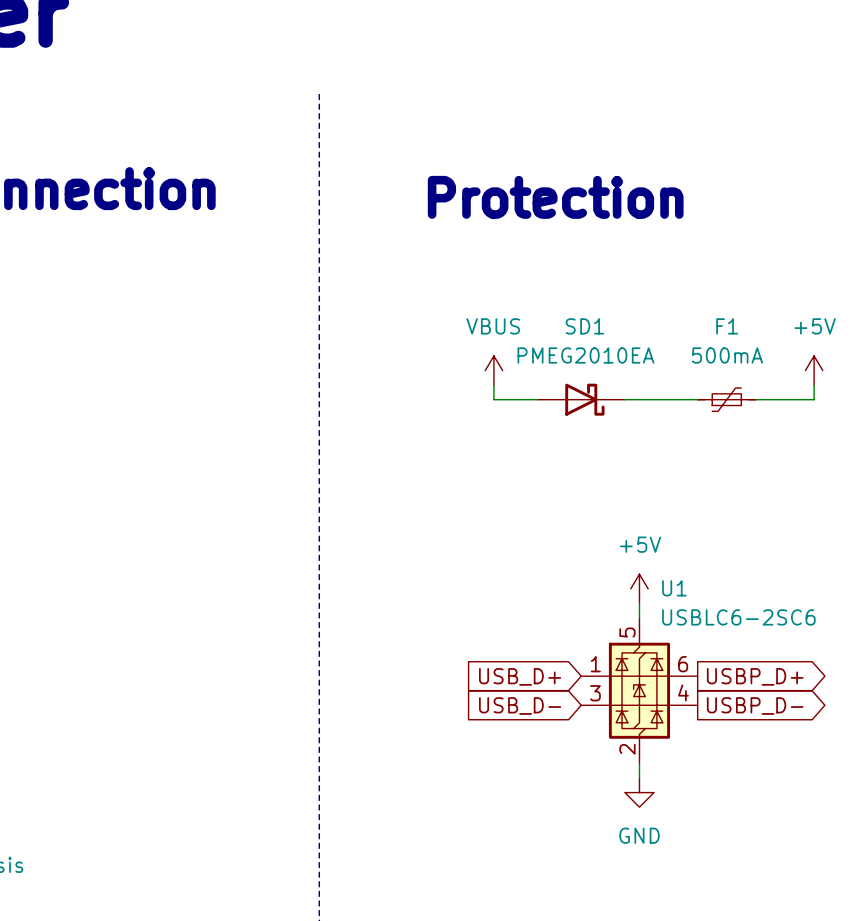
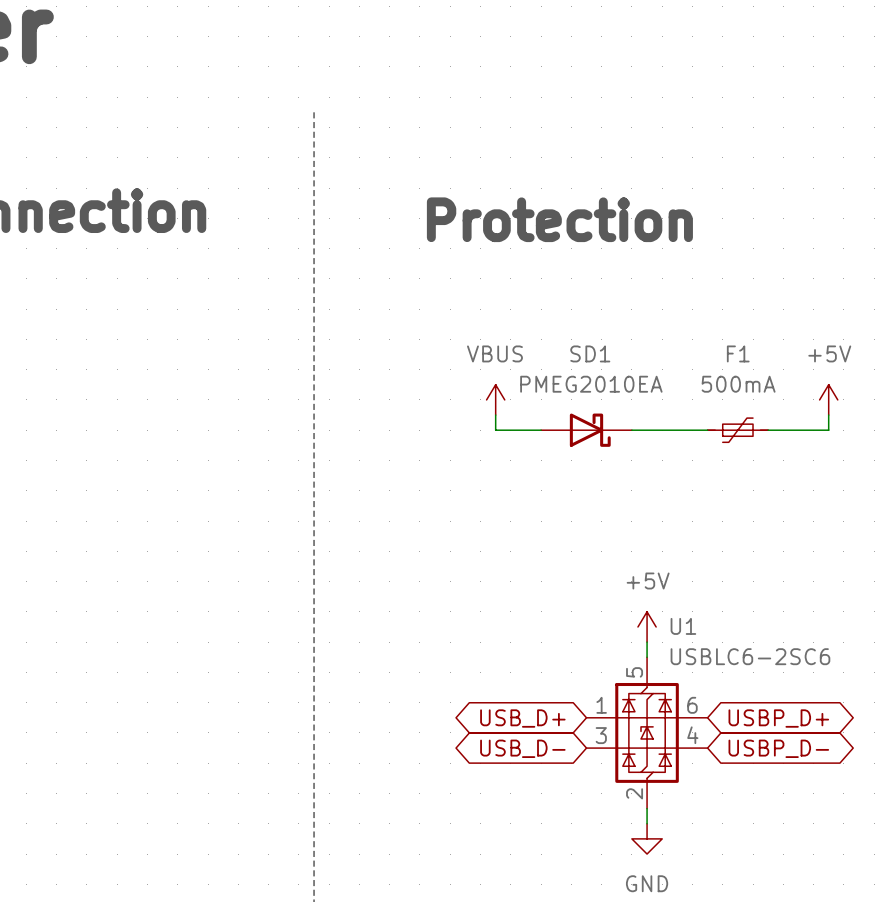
global label shape: input (520, 676) -> bidirectional (522, 718)
global label shape: output (755, 676) -> bidirectional (778, 718)
global label shape: input (520, 705) -> bidirectional (522, 748)
global label shape: output (755, 705) -> bidirectional (778, 748)

